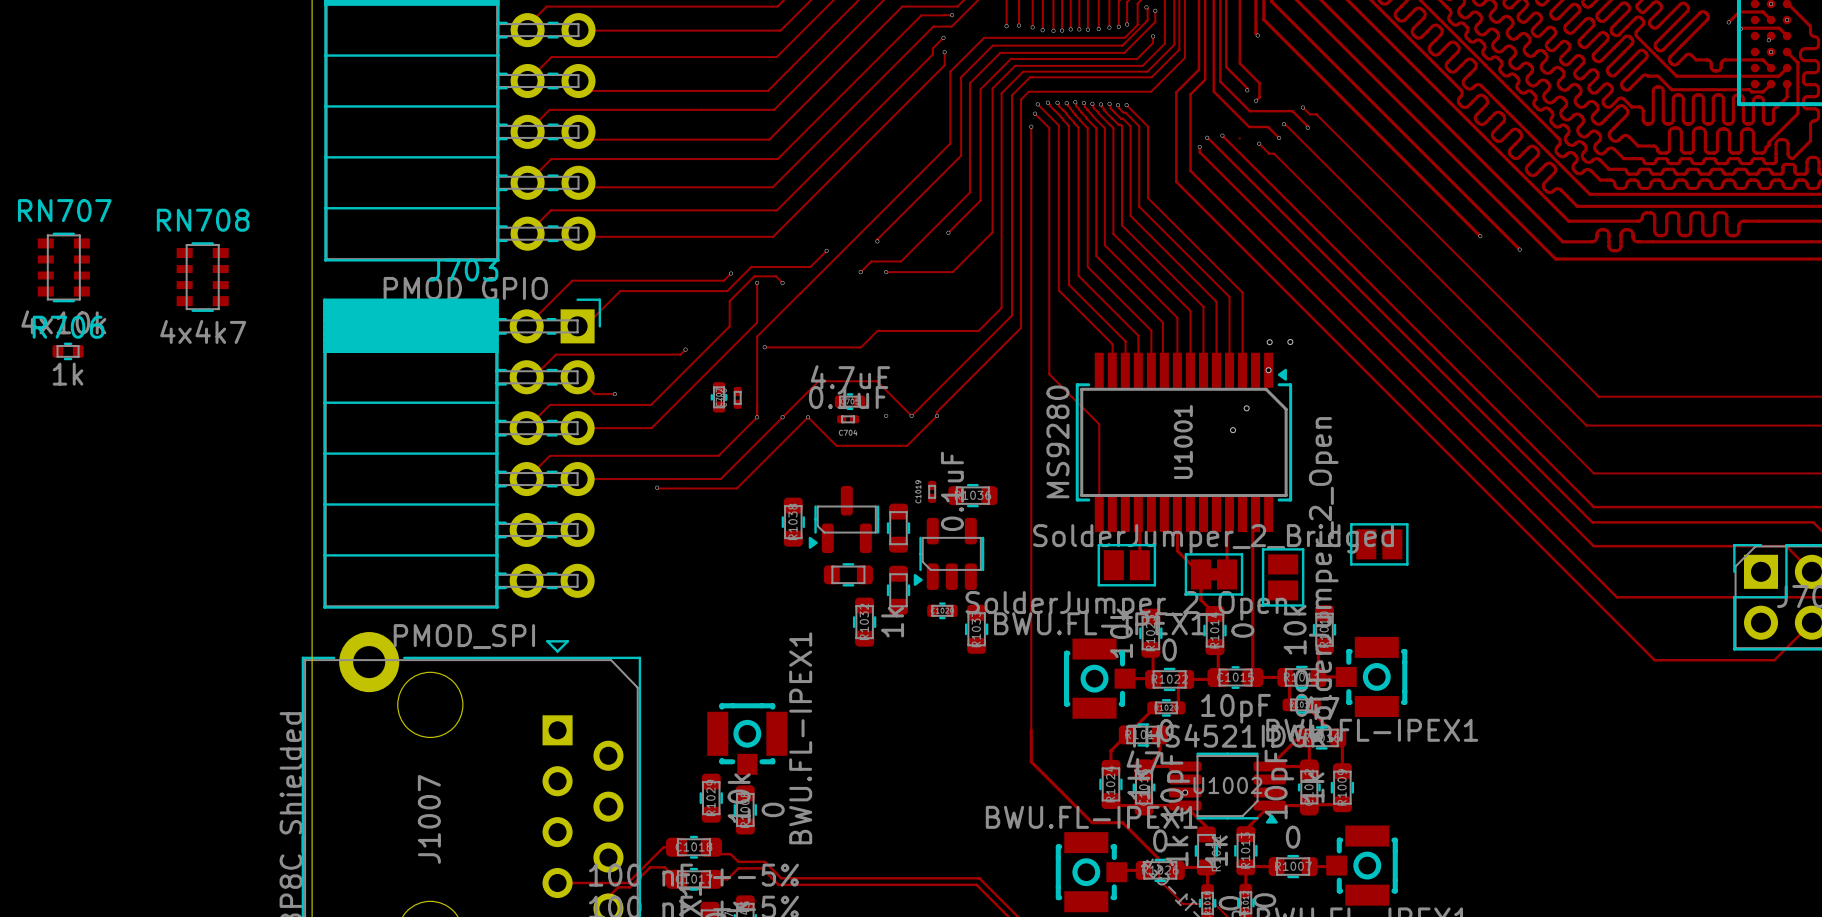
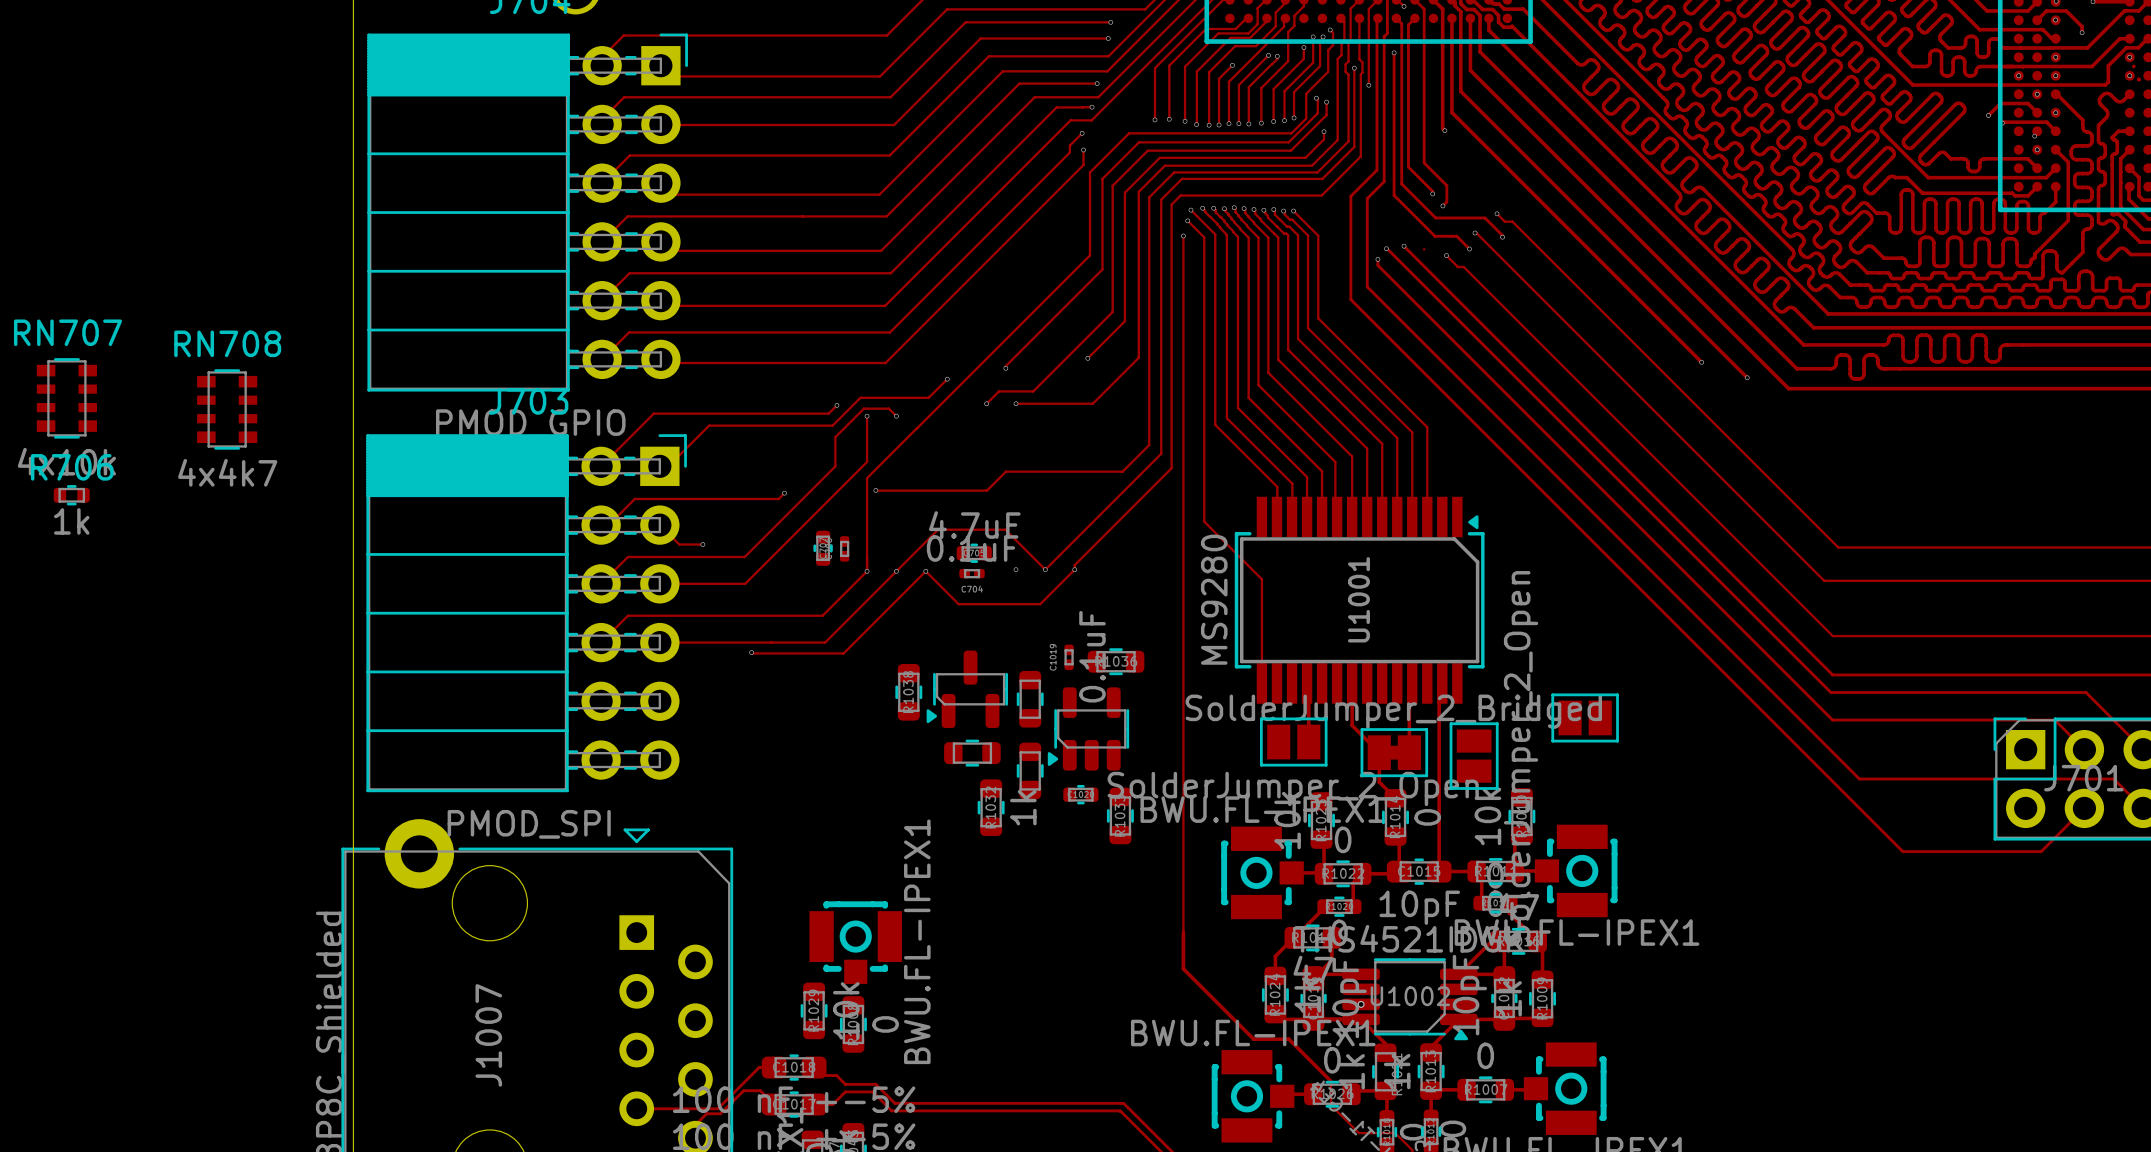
via: (1269, 342) -> none
via: (1290, 342) -> none
via: (1268, 370) -> none
via: (1246, 408) -> none
via: (1233, 430) -> none

